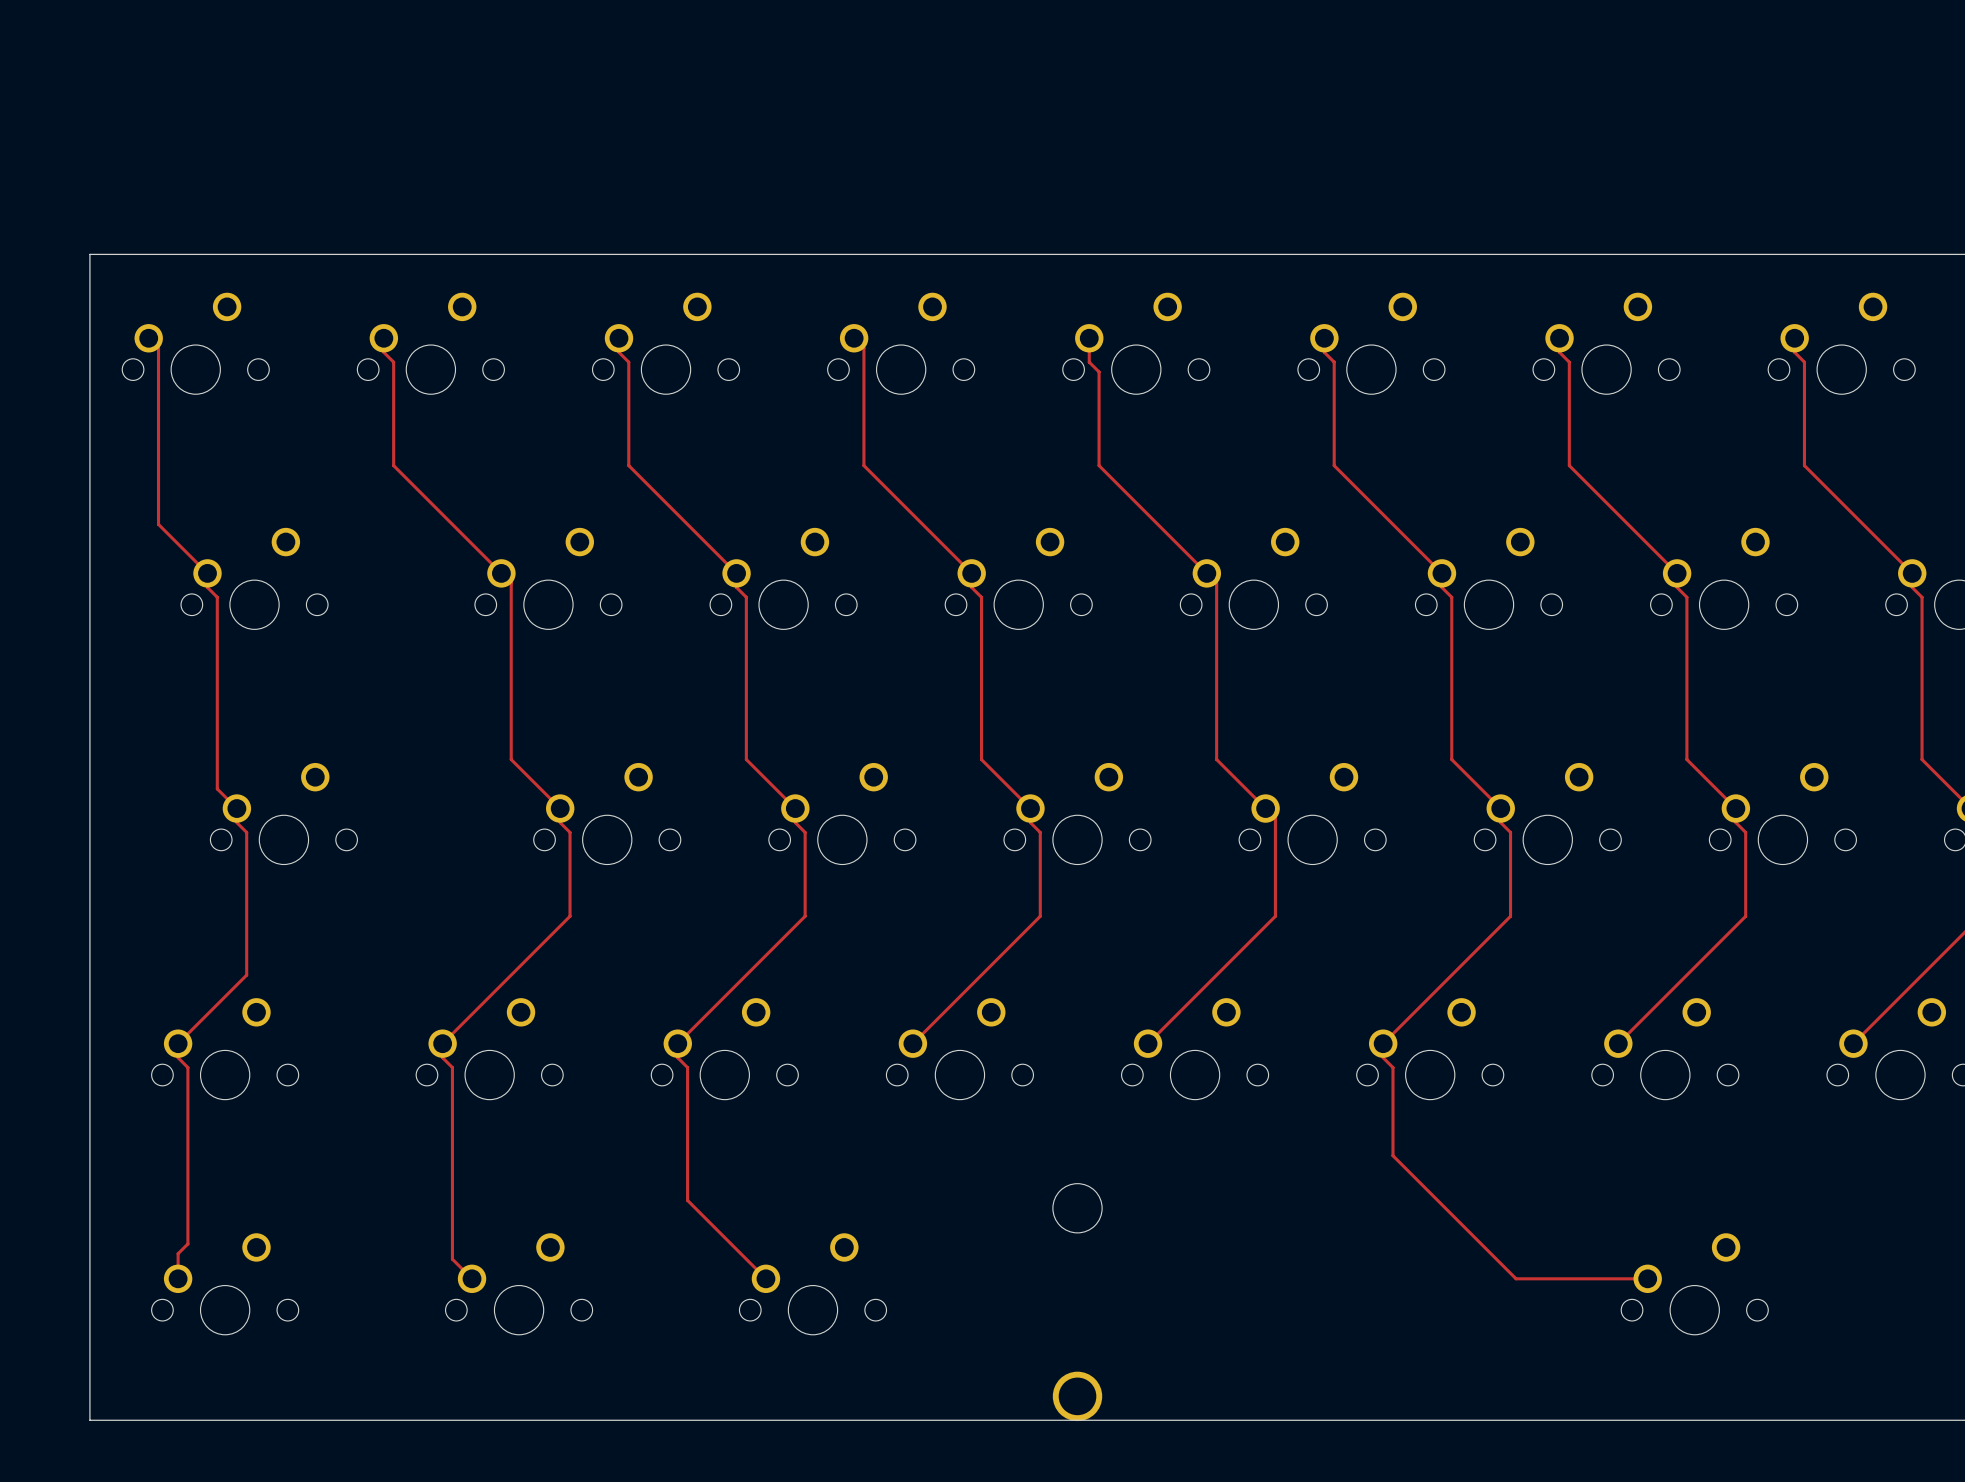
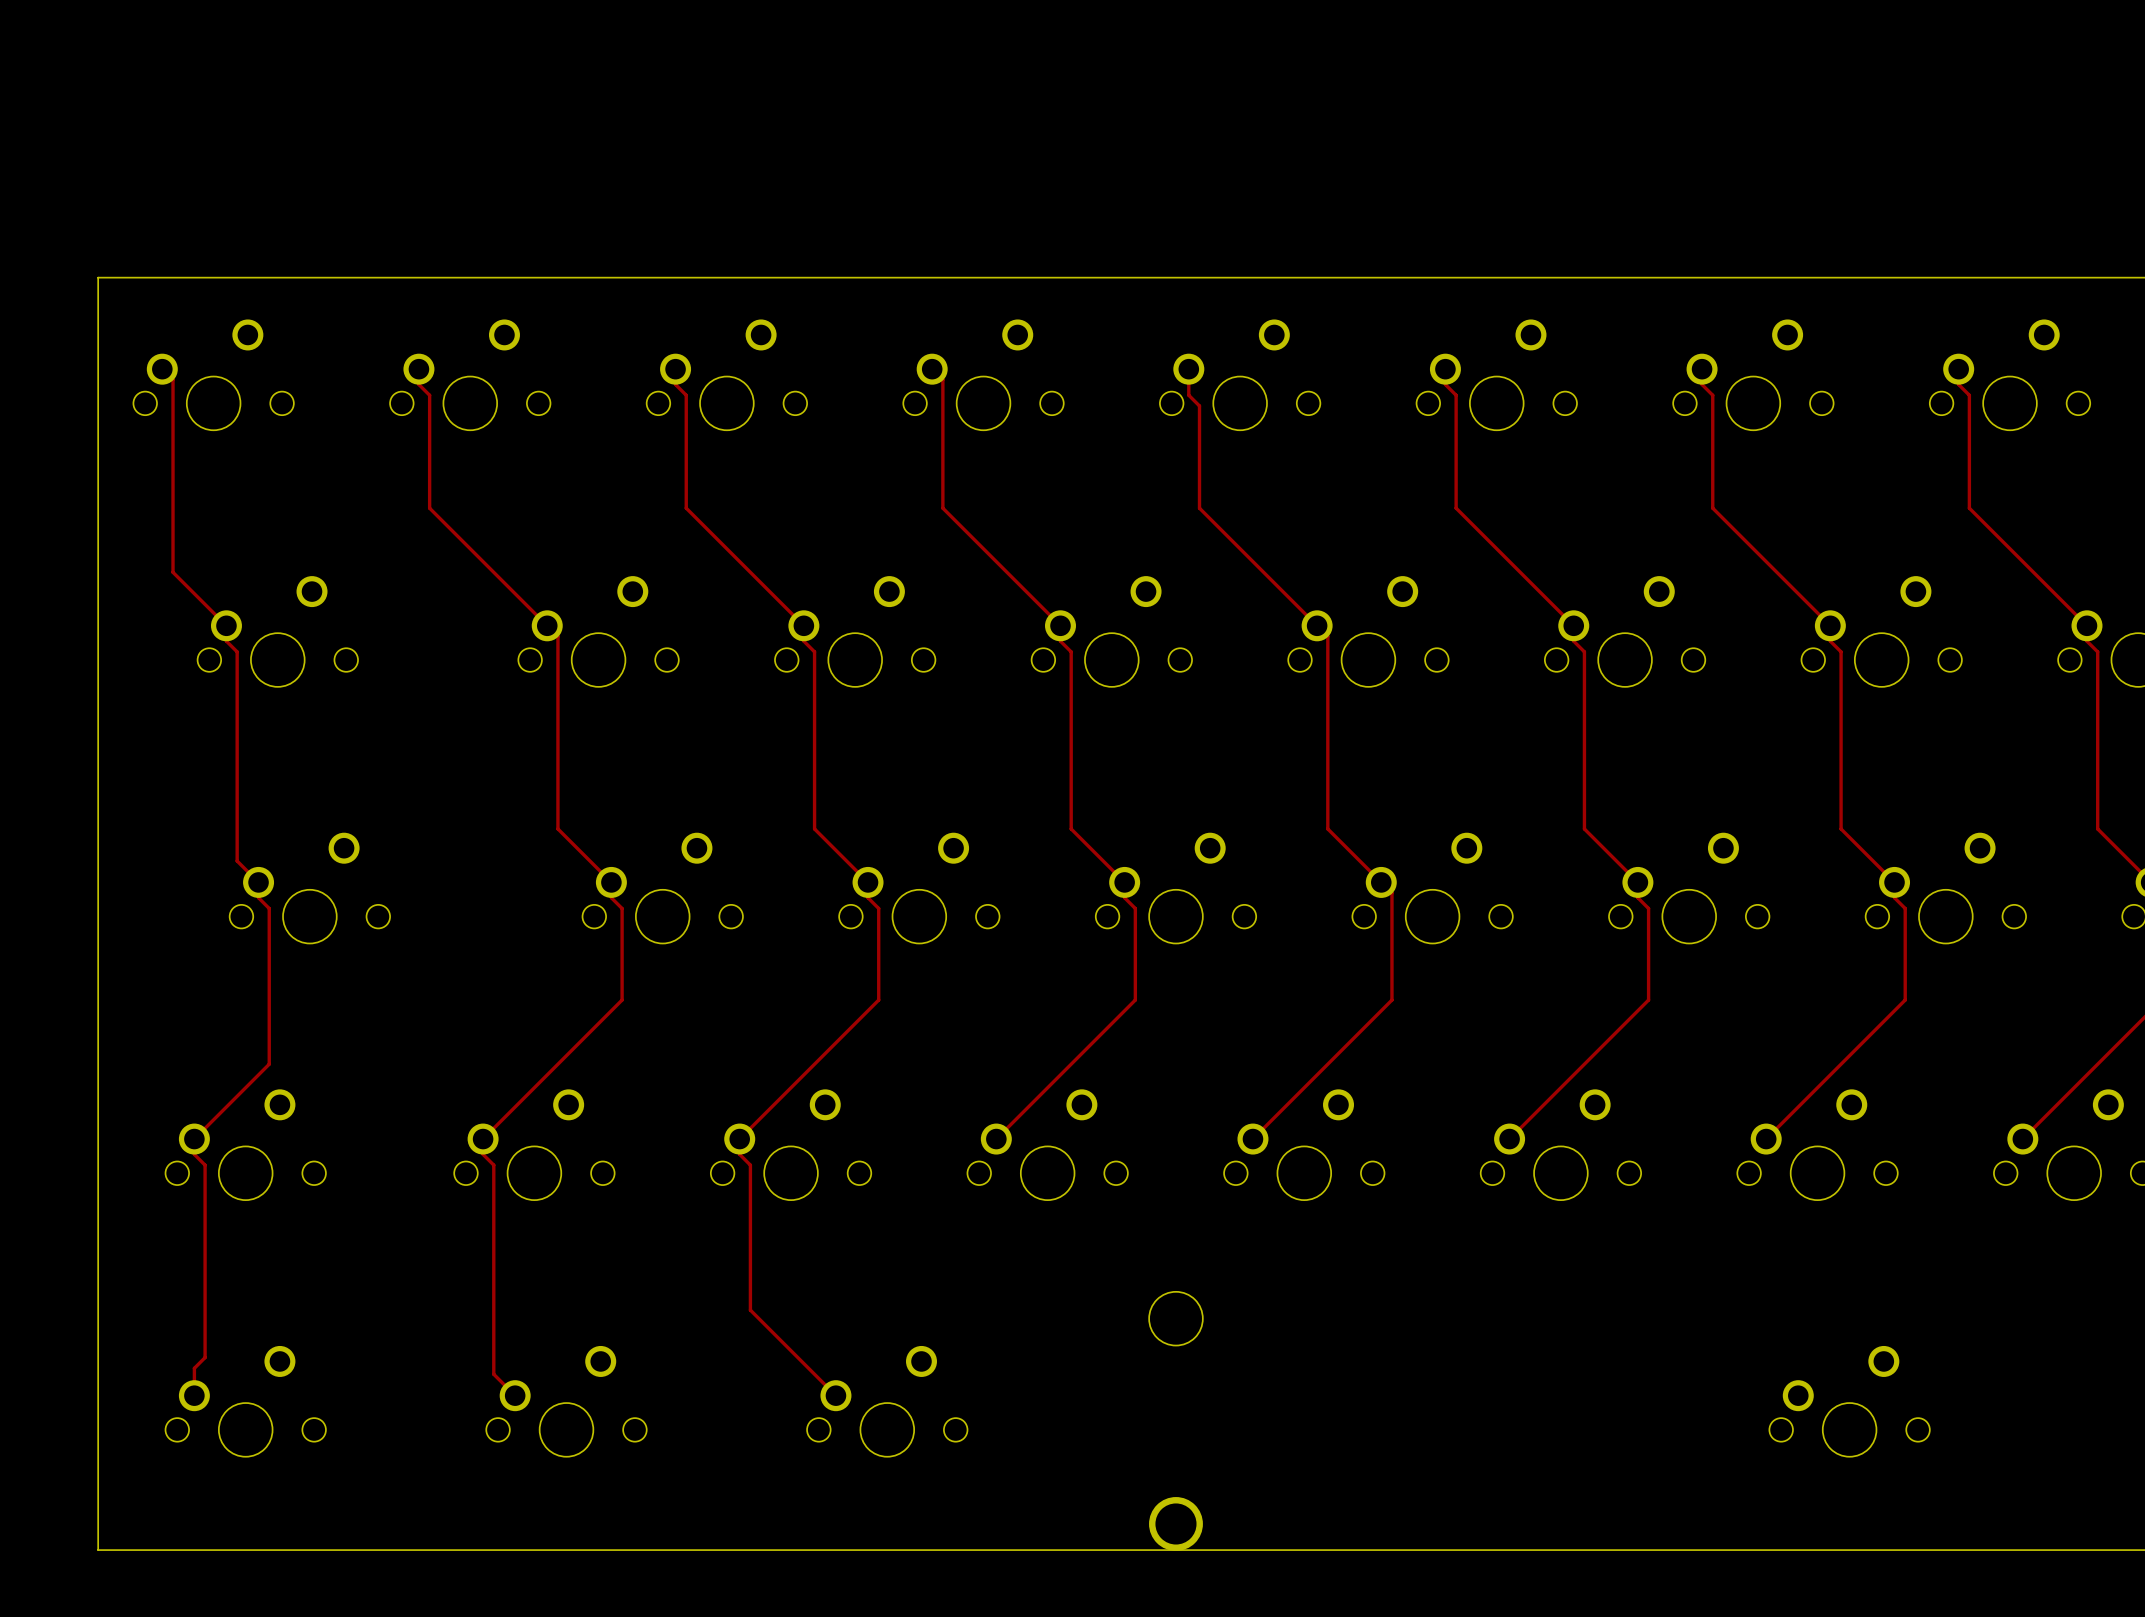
track: (1383, 1043) (1383, 1057) (1392, 1067) (1392, 1155) (1516, 1278) (1647, 1278) -> none

